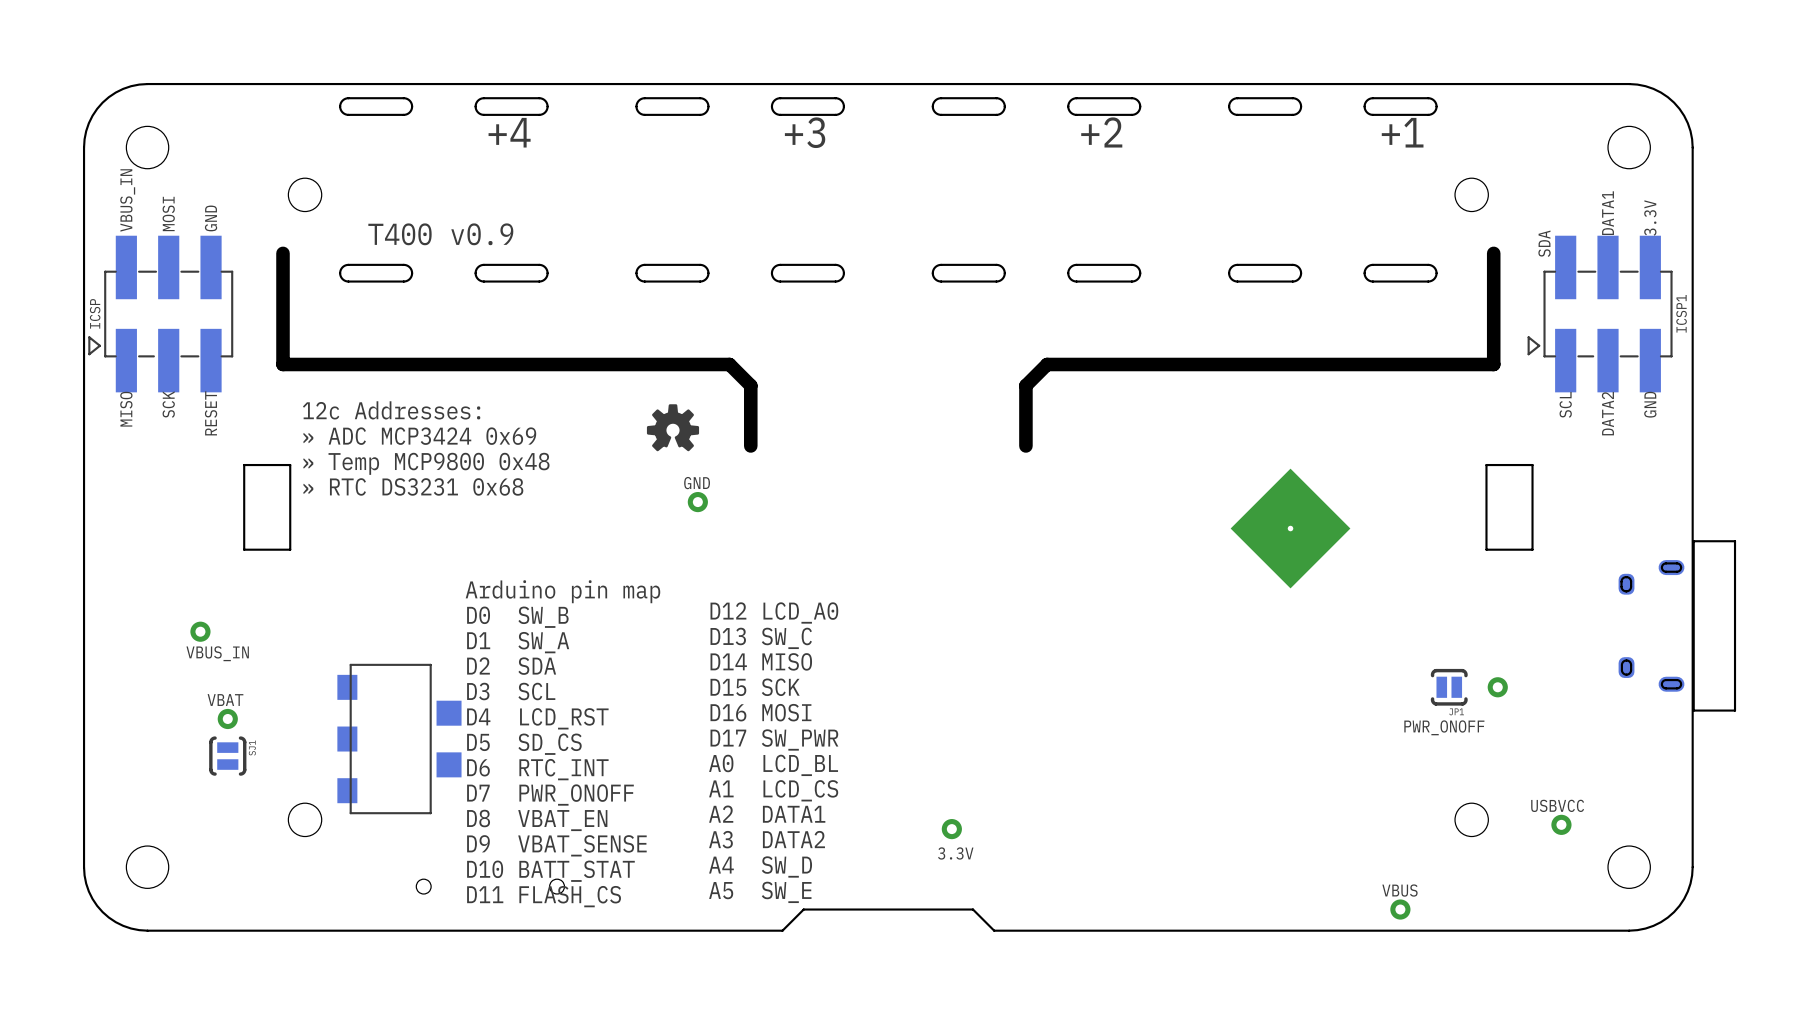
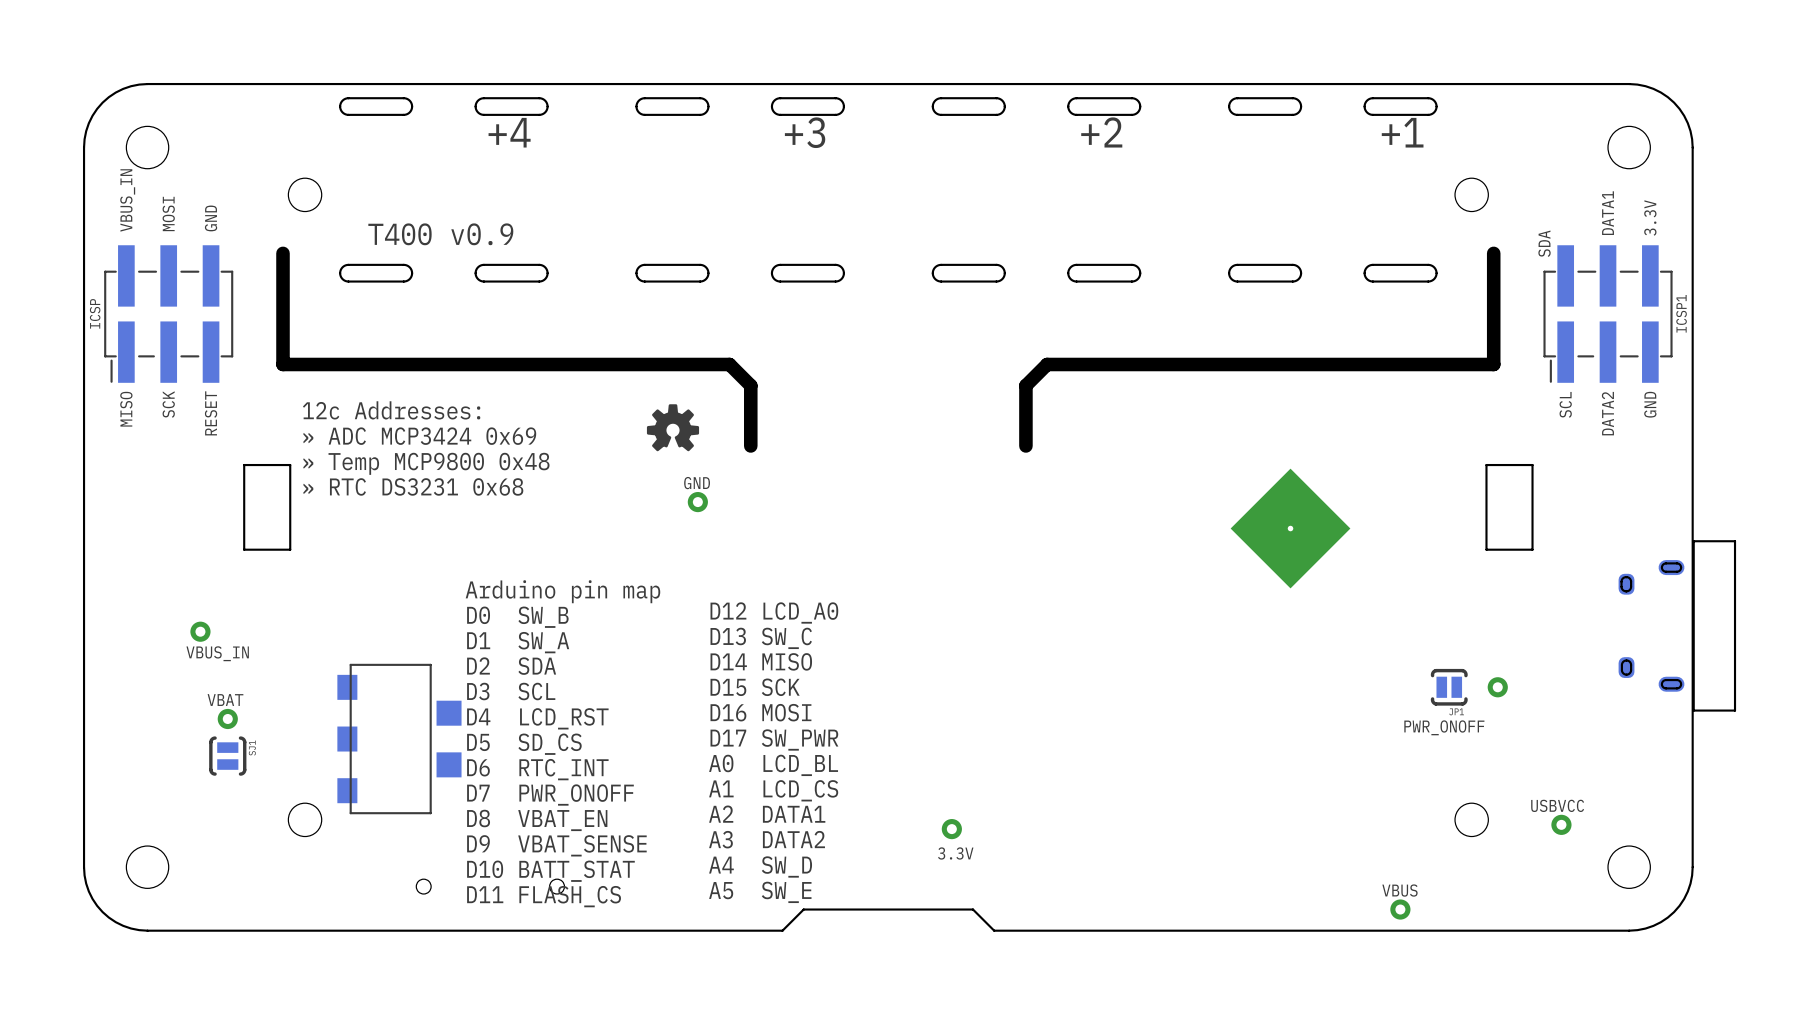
ICSP footprint: [88, 235, 234, 393] -> [104, 245, 234, 383]
ICSP1 footprint: [1527, 235, 1673, 393] -> [1543, 245, 1673, 383]

